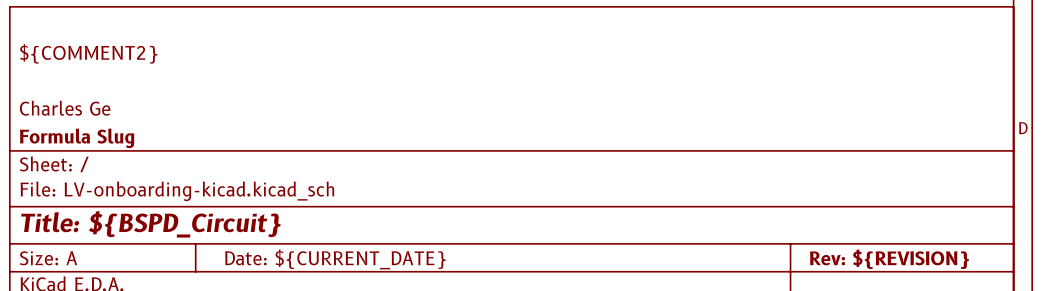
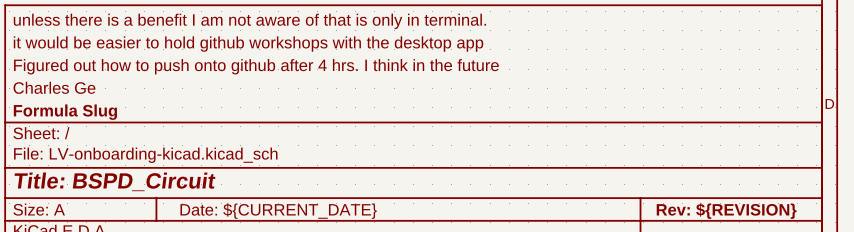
title block: none -> unless there is a benefit I am not aware of that is only in terminal. (249, 21)
title block: ${COMMENT2} (88, 53) -> it would be easier to hold github workshops with the desktop app (248, 44)
title block: none -> Figured out how to push onto github after 4 hrs. I think in the future (256, 66)
title block: Title: ${BSPD_Circuit} (150, 224) -> Title: BSPD_Circuit (114, 181)

